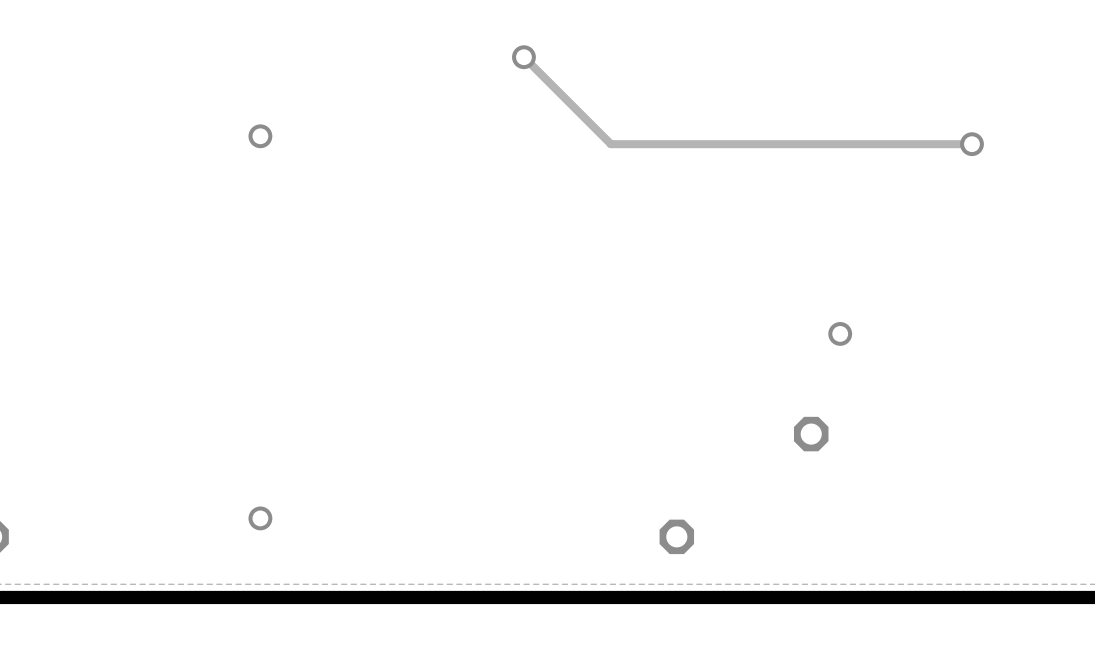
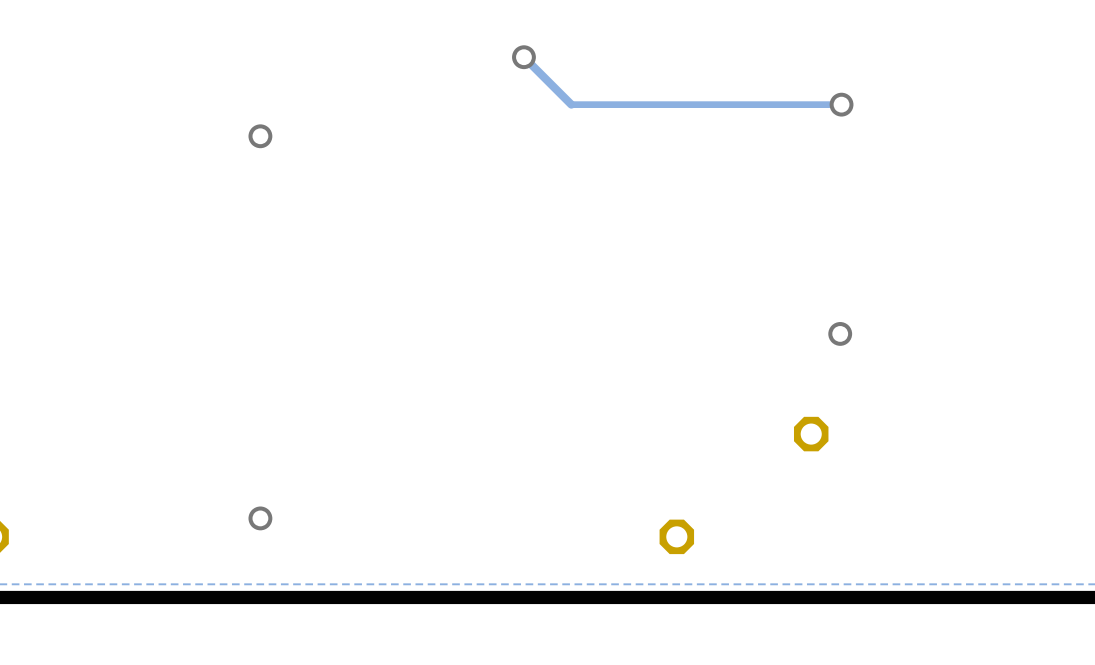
track: (571, 104) (610, 144) (971, 144) -> (571, 104) (841, 104)
via: none -> (841, 104)
via: (971, 144) -> none

